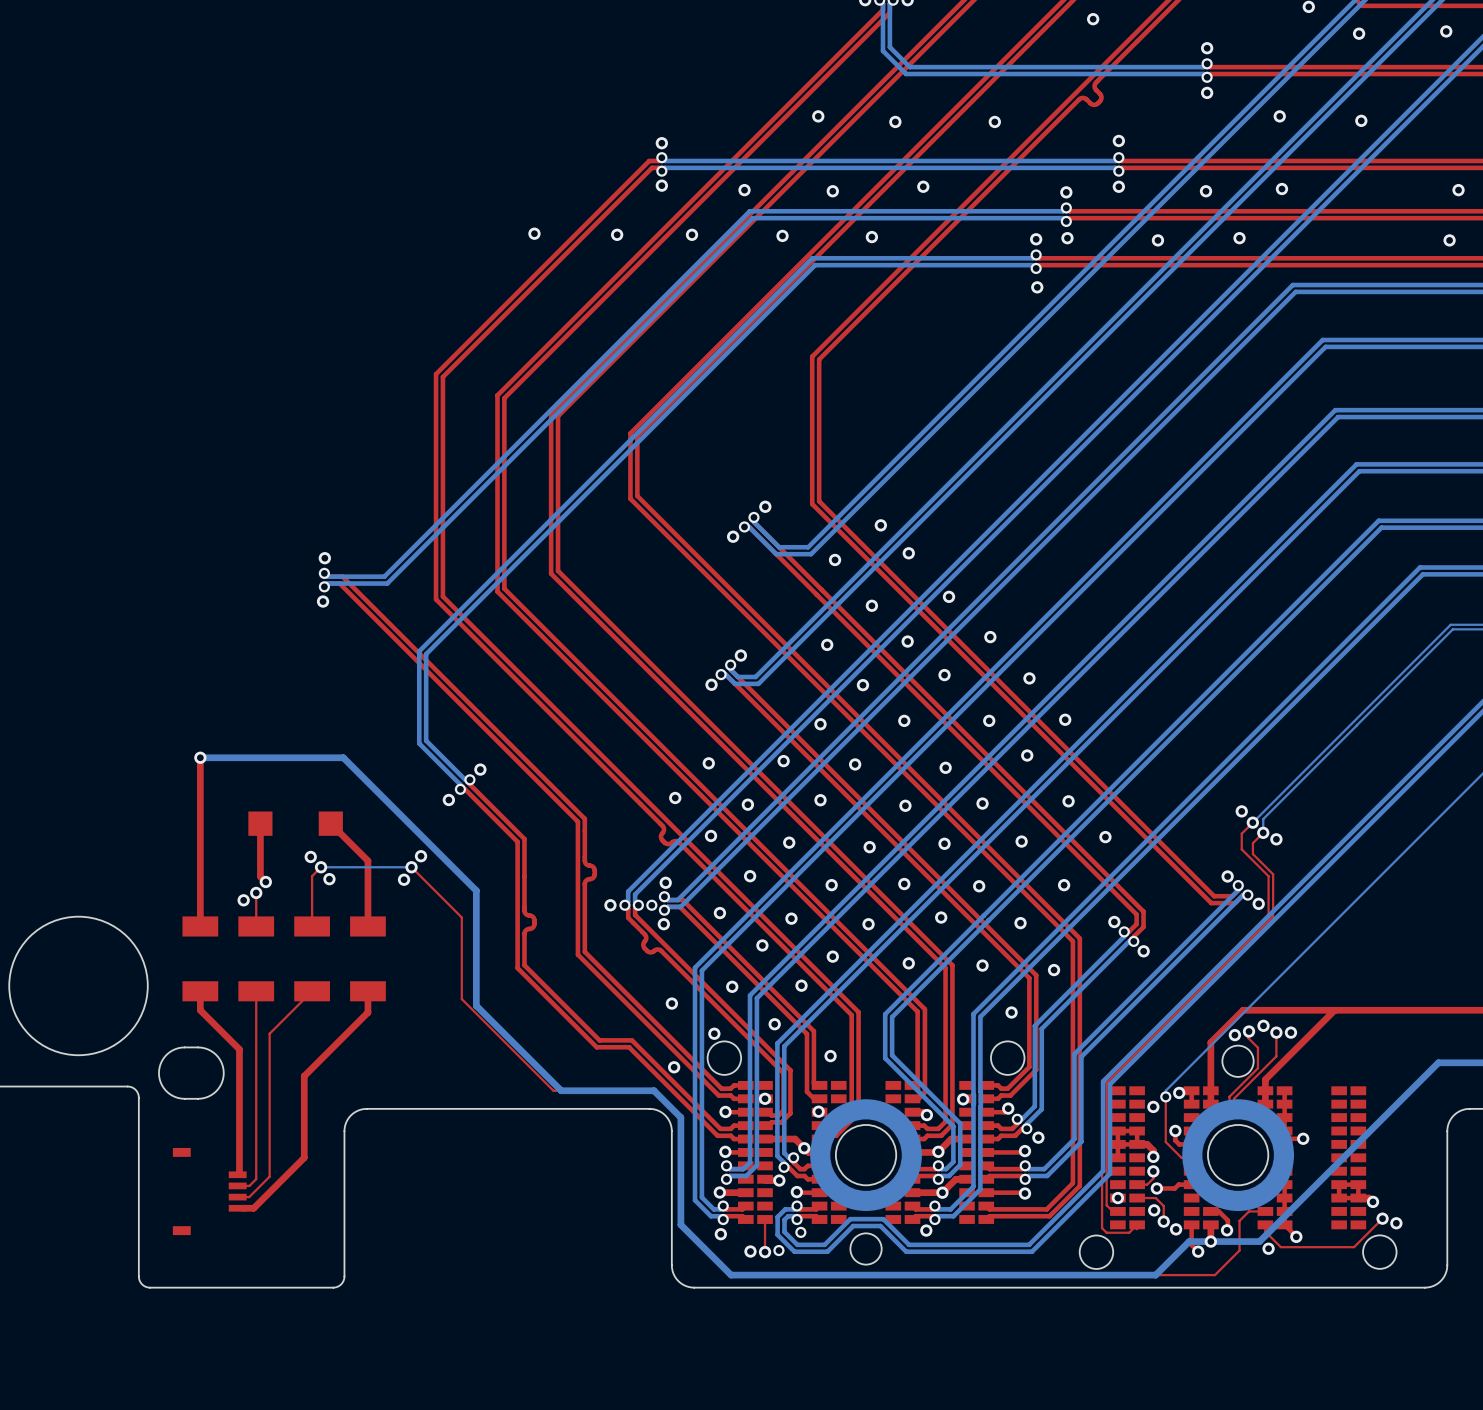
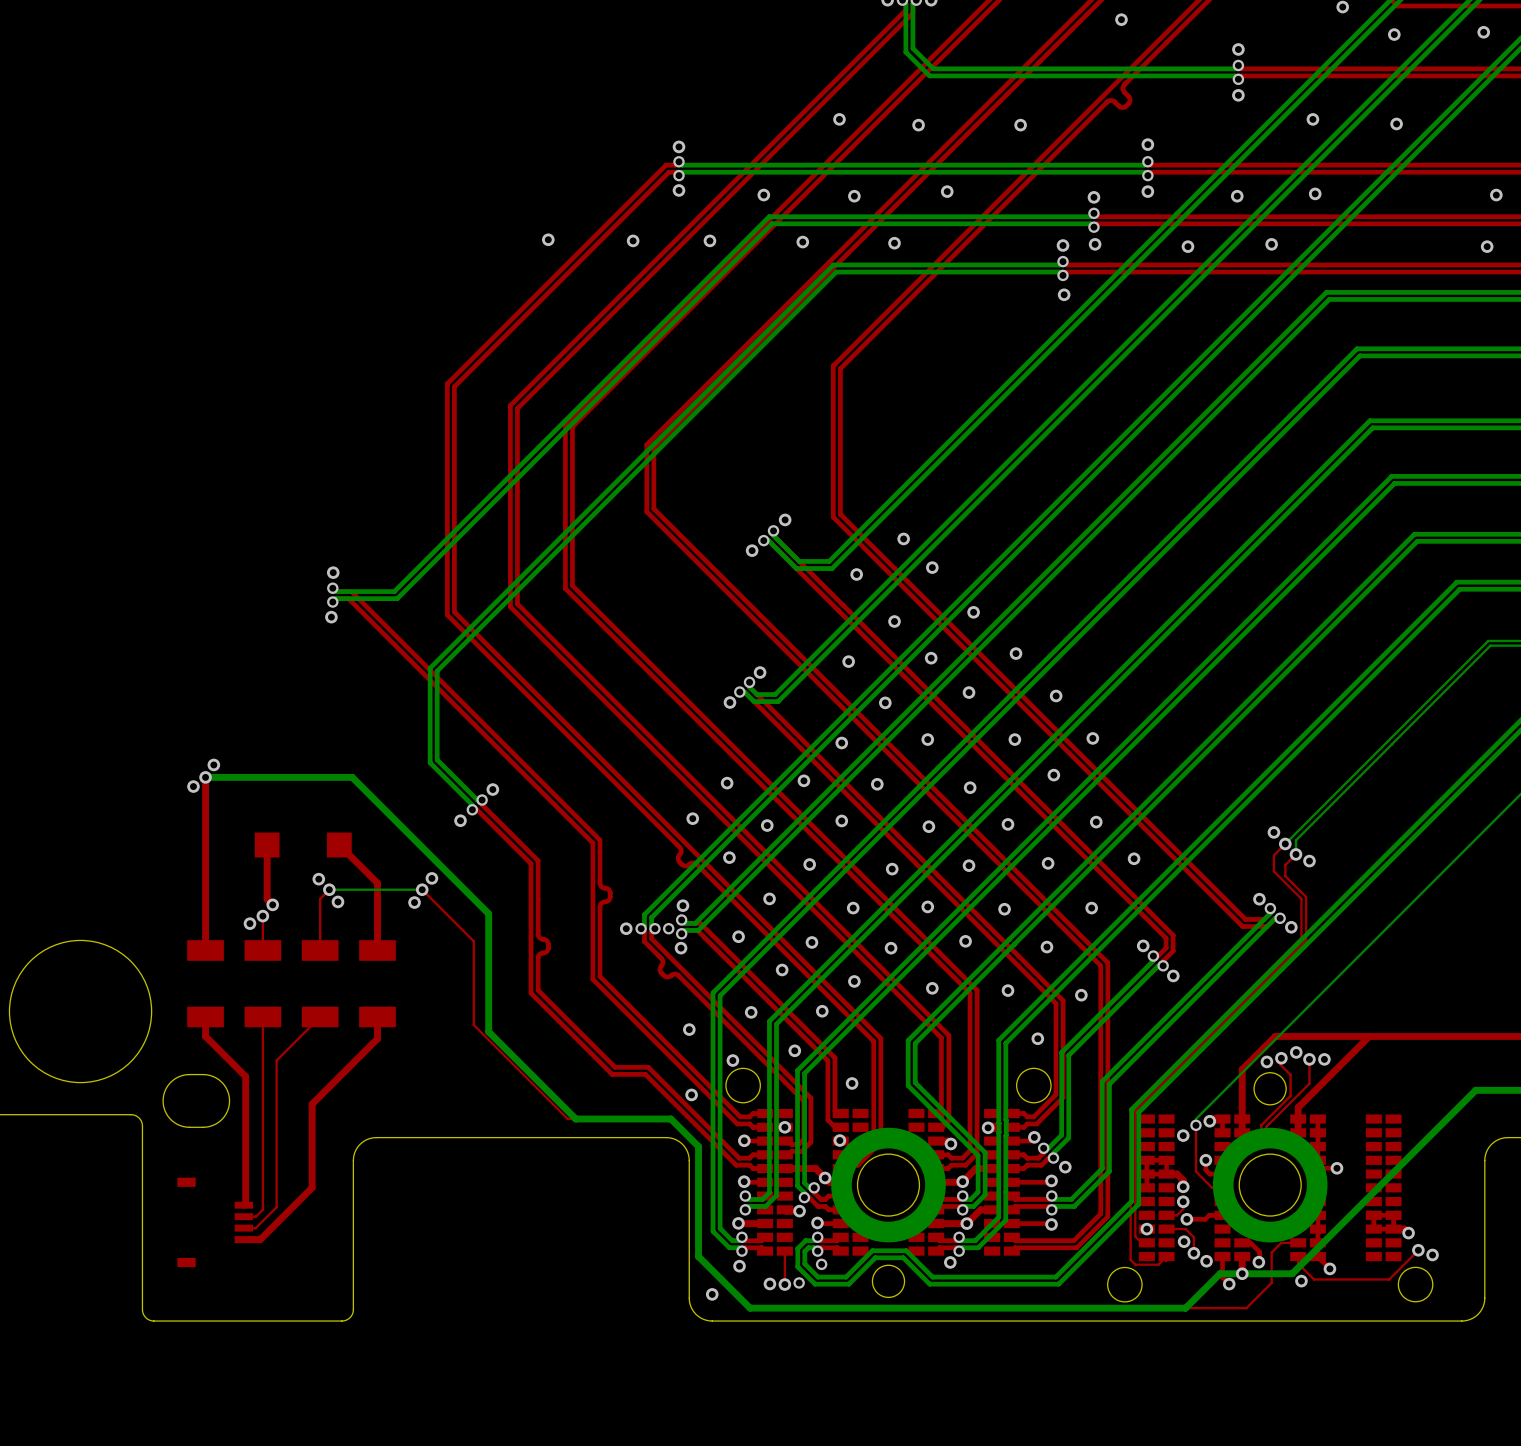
via: none -> (213, 764)
via: none -> (193, 786)
via: none -> (712, 1294)

